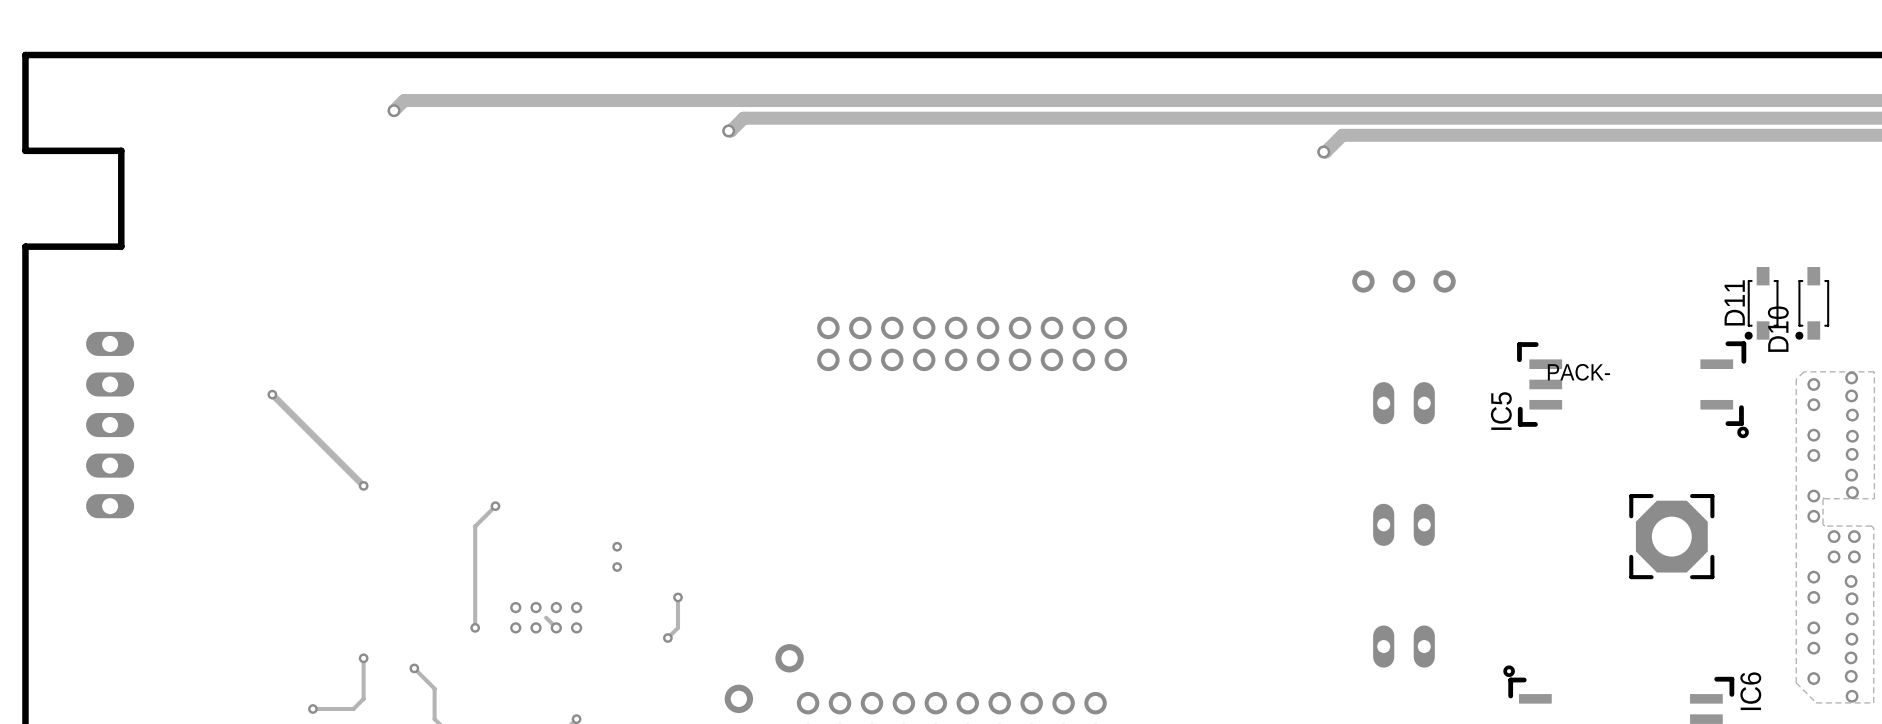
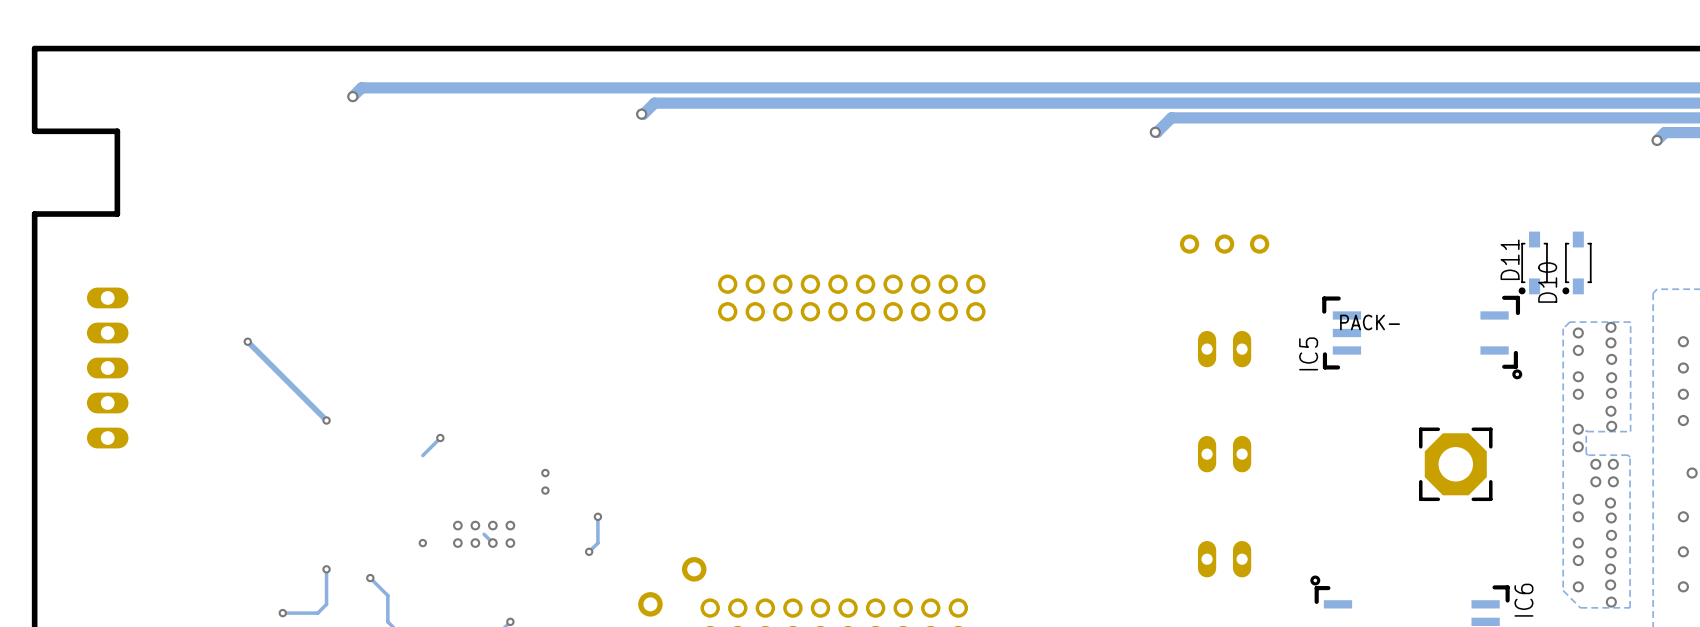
track: (475, 526) (475, 627) -> none

